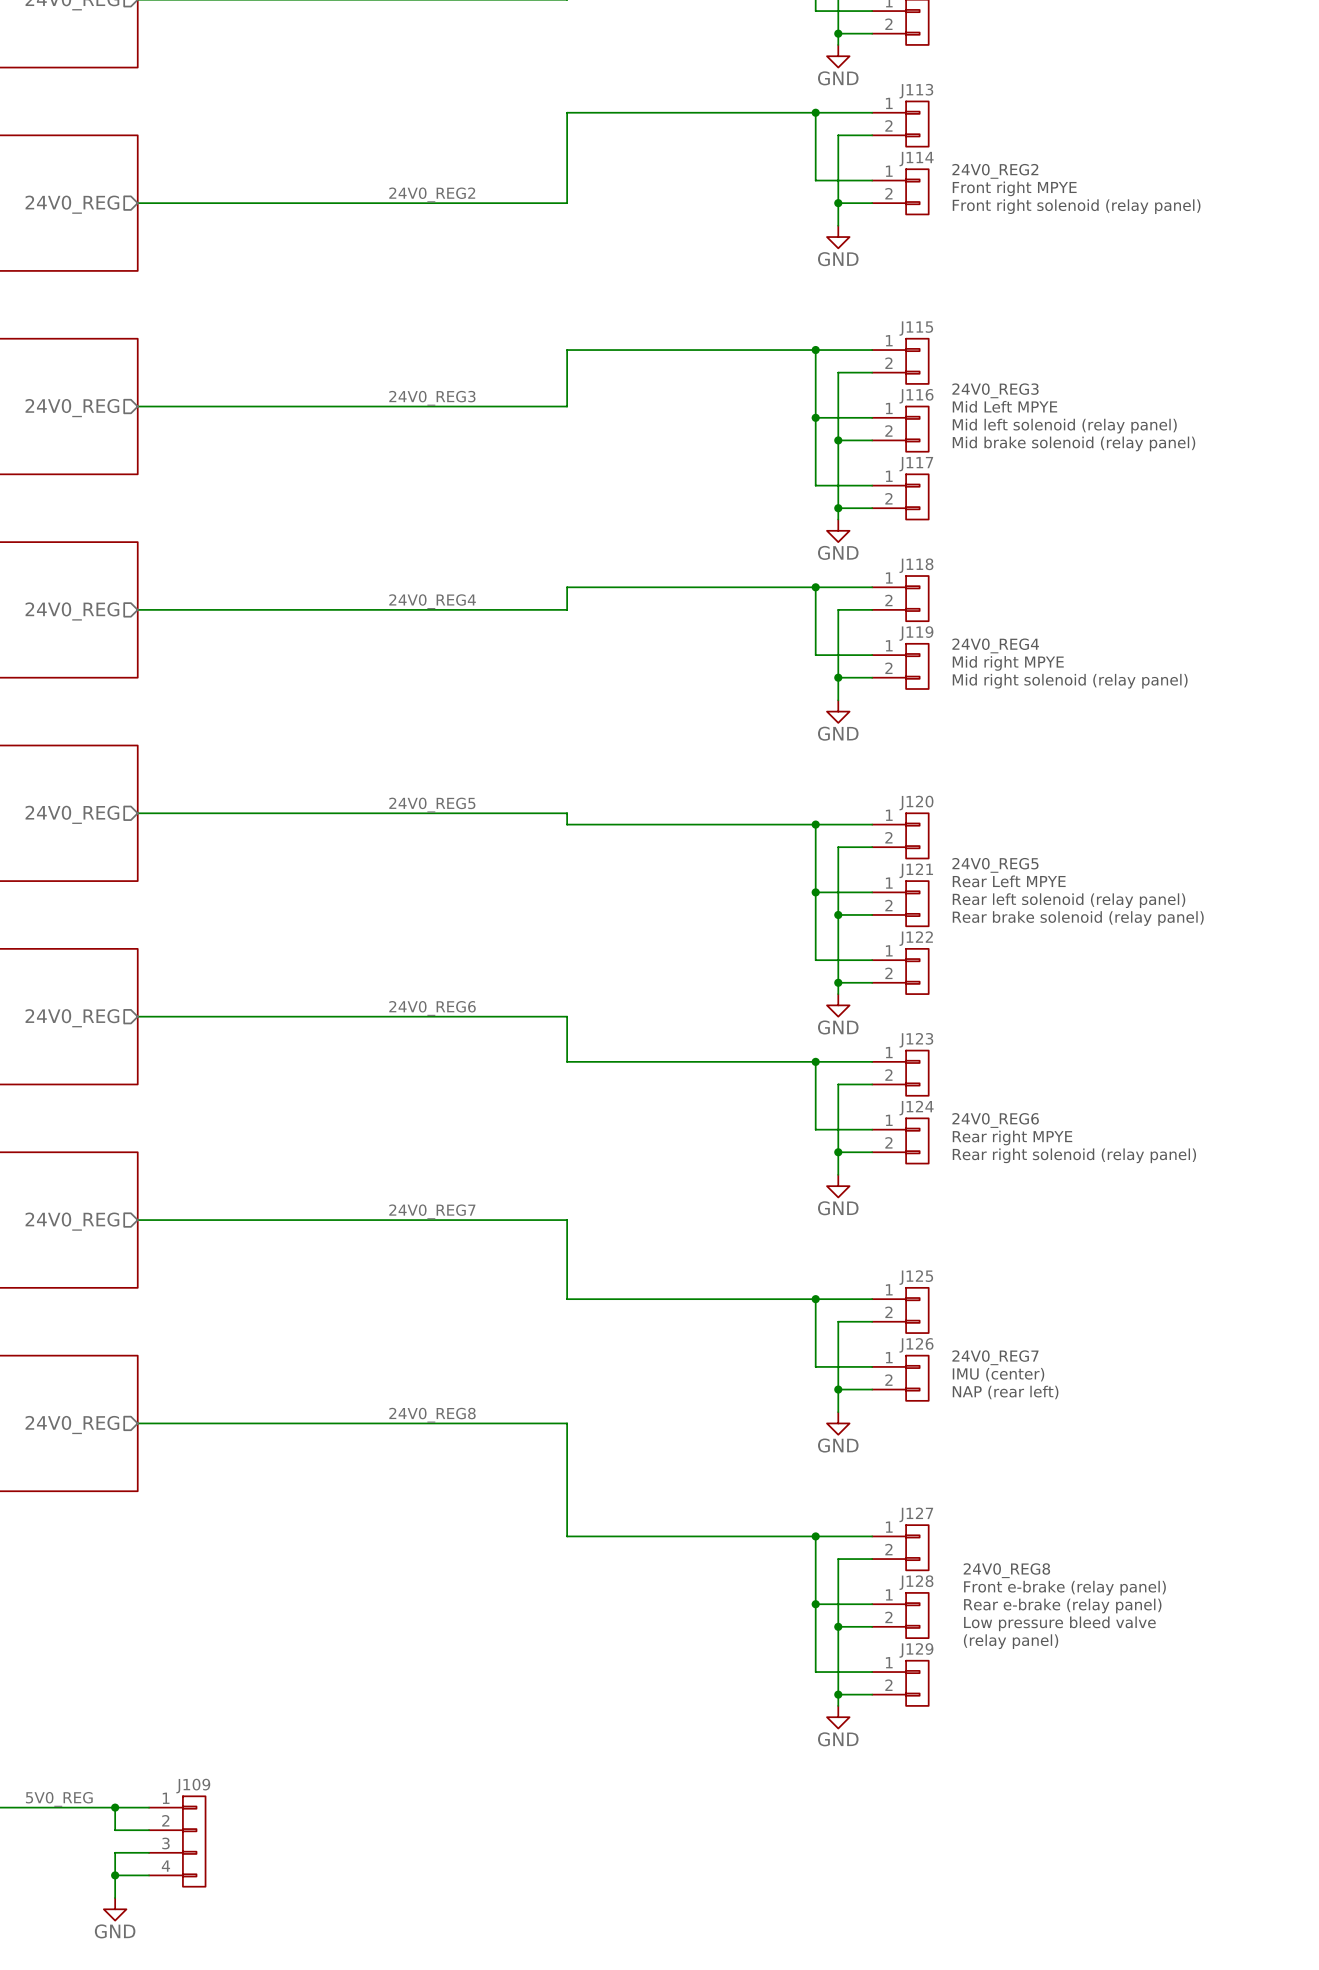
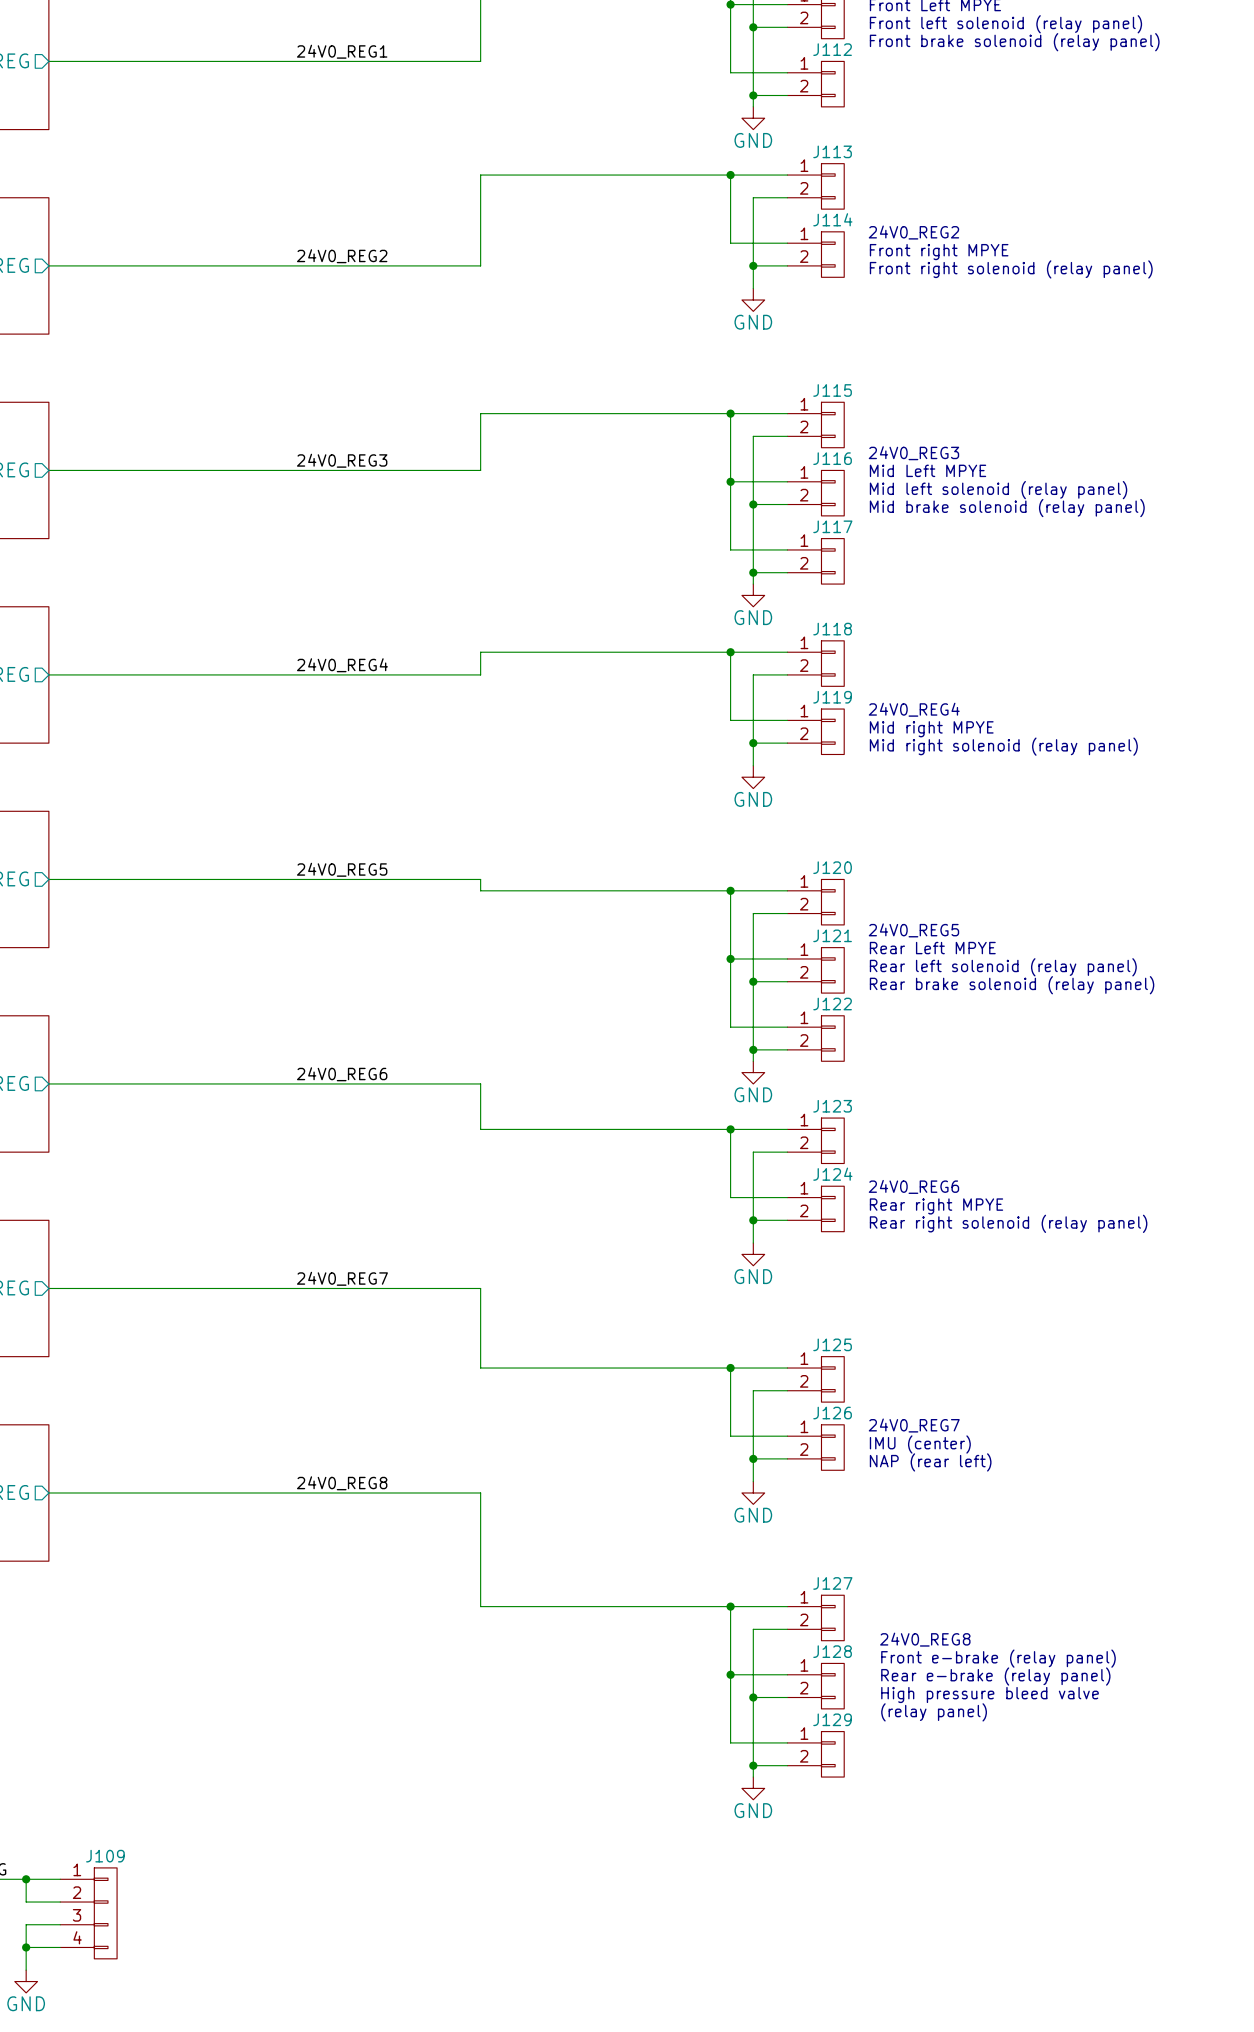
text: Low pressure bleed valve (1059, 1623) -> High pressure bleed valve (990, 1694)

